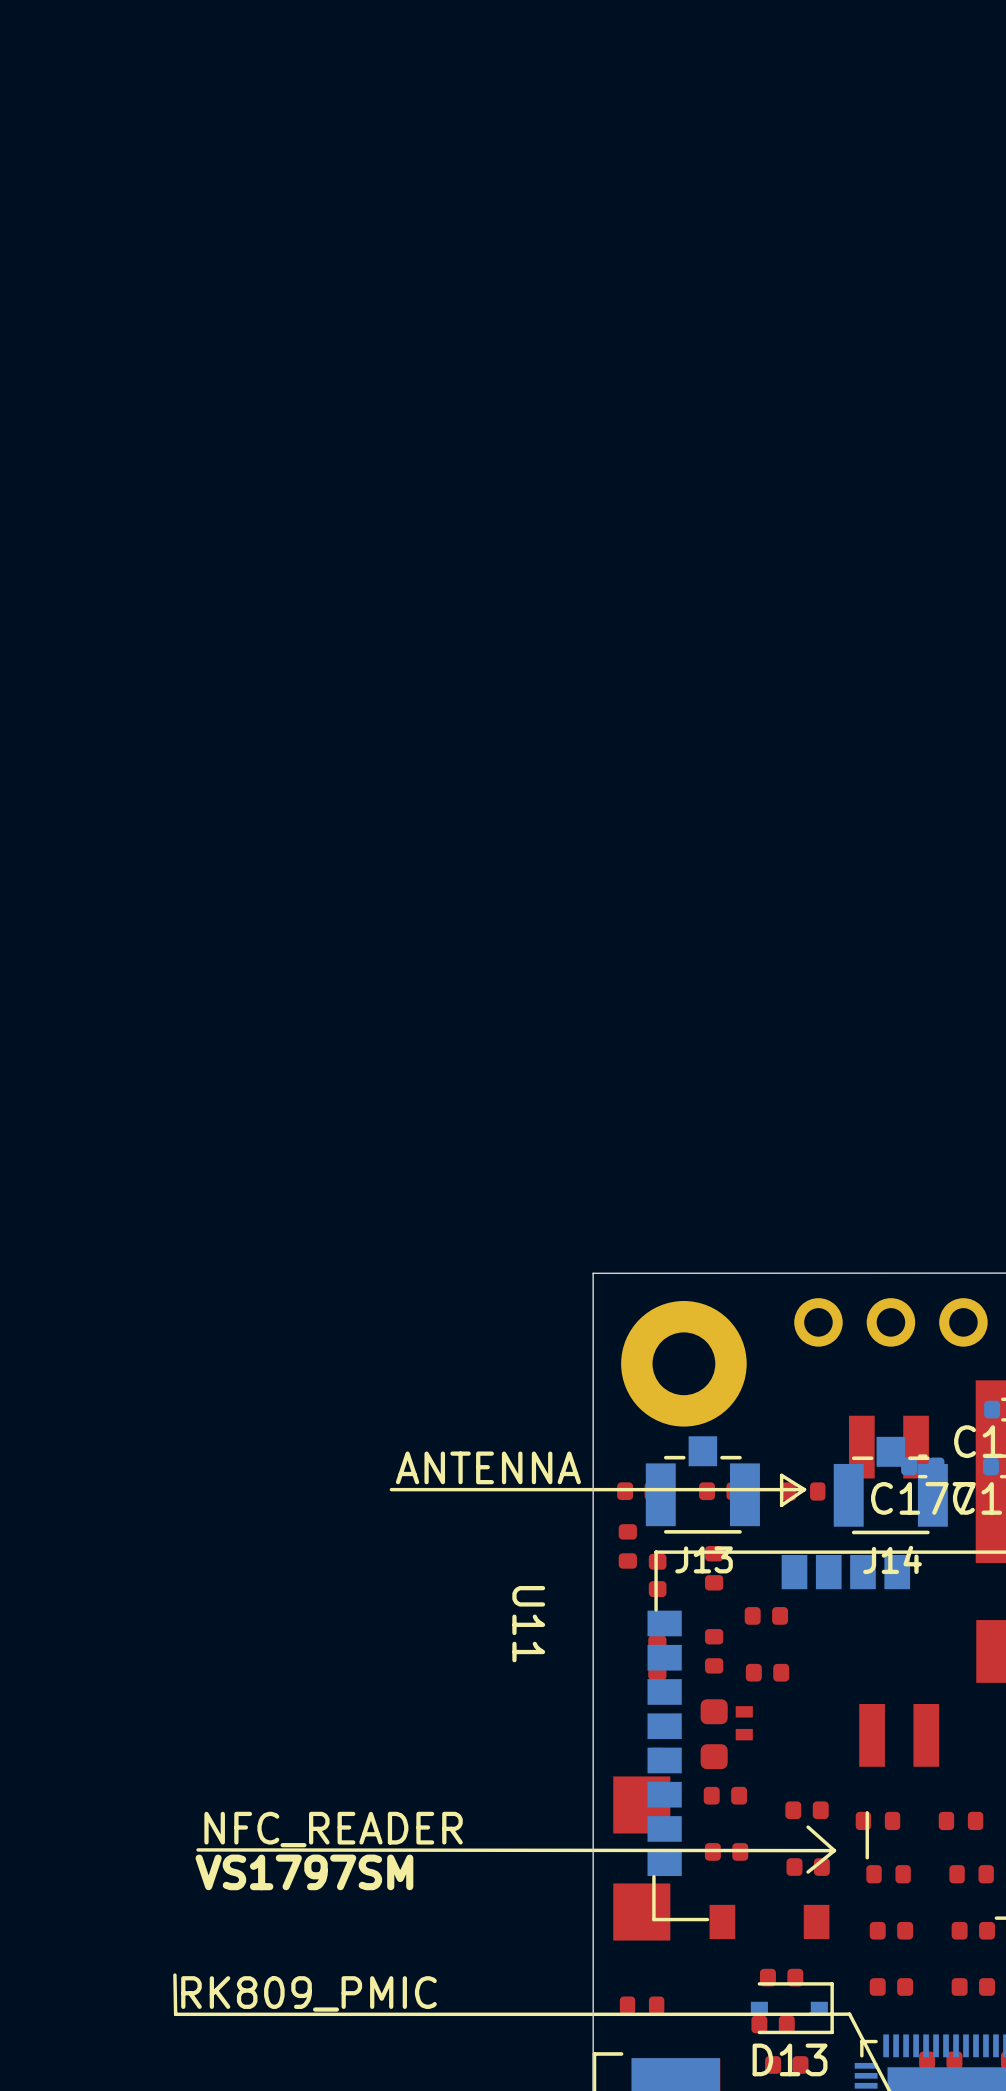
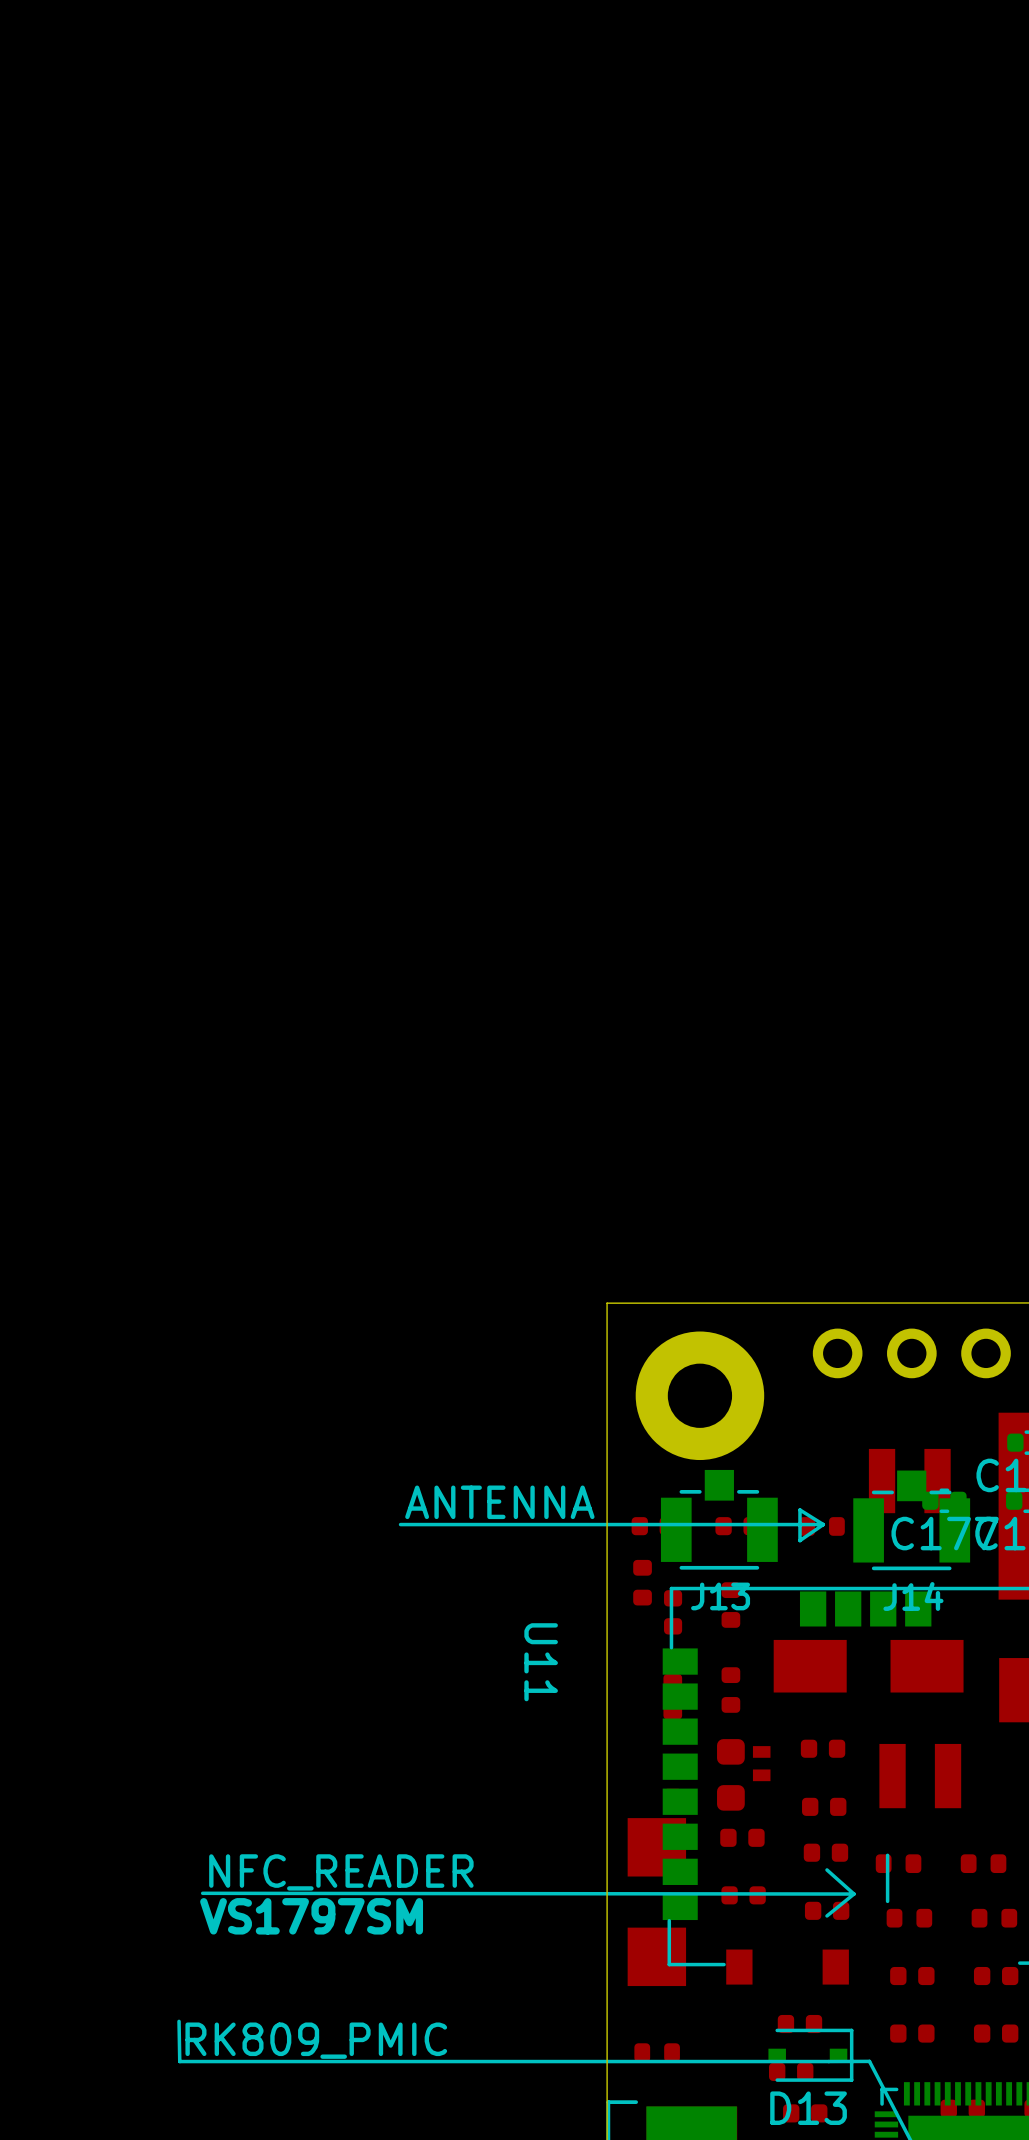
part: (766, 1615) -> none
part: none -> (868, 1666)
part: (767, 1672) -> none
part: none -> (823, 1748)
part: none -> (824, 1806)

